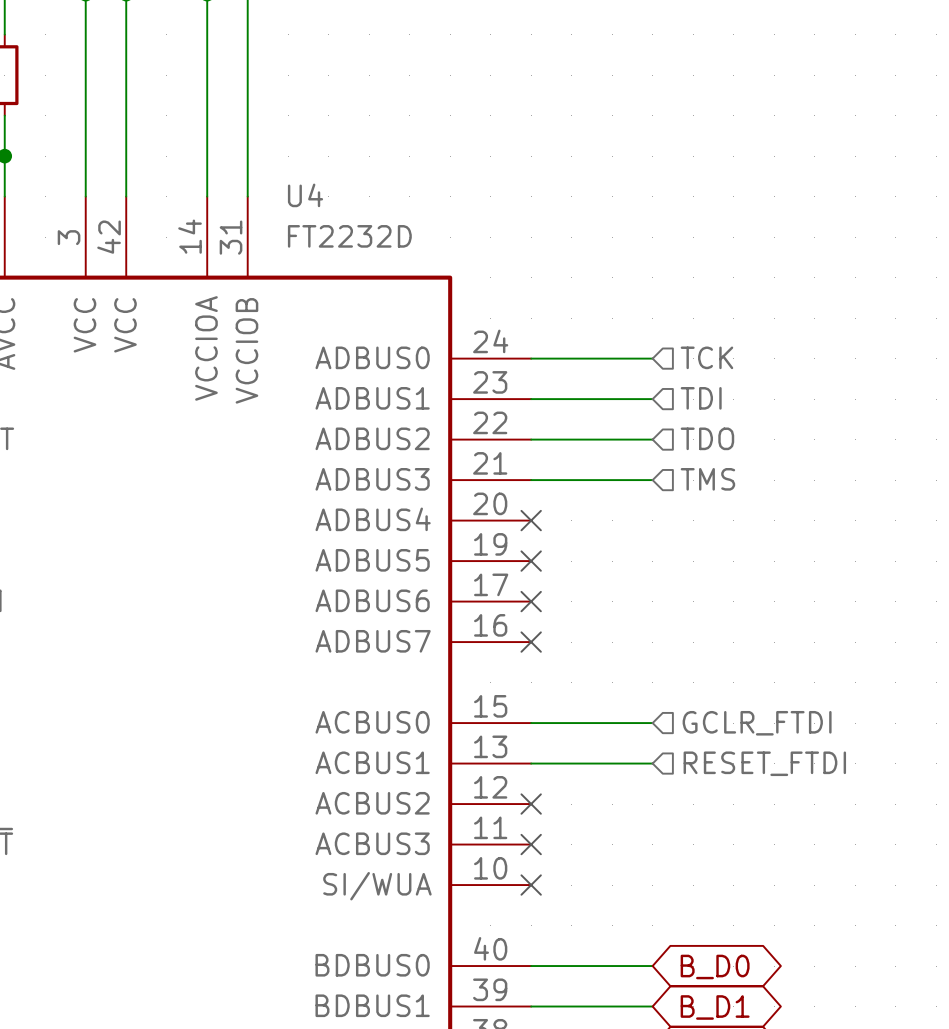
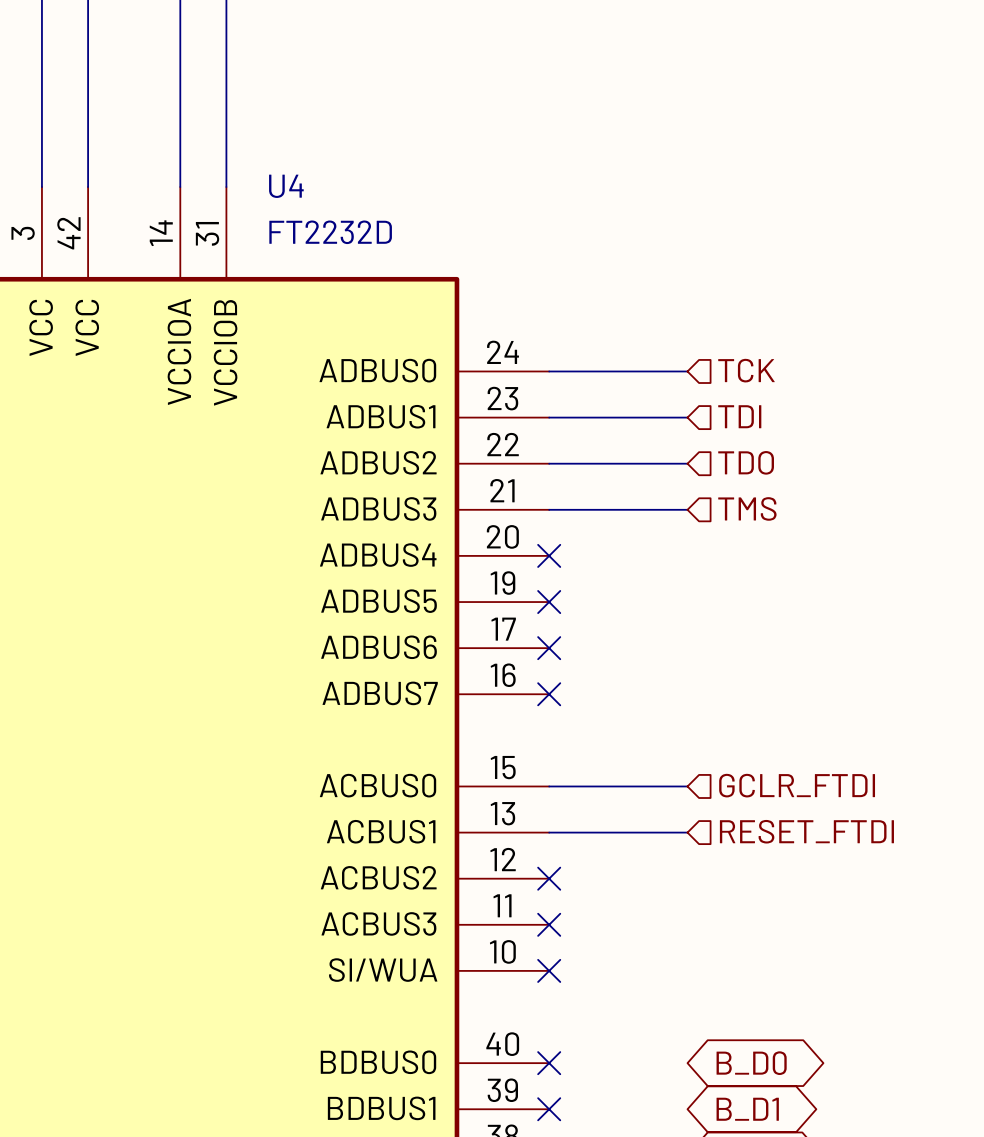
wire: (531, 966) (652, 966) -> none
no-connect mark: none -> (549, 1063)
wire: (531, 1006) (652, 1006) -> none
no-connect mark: none -> (549, 1109)

